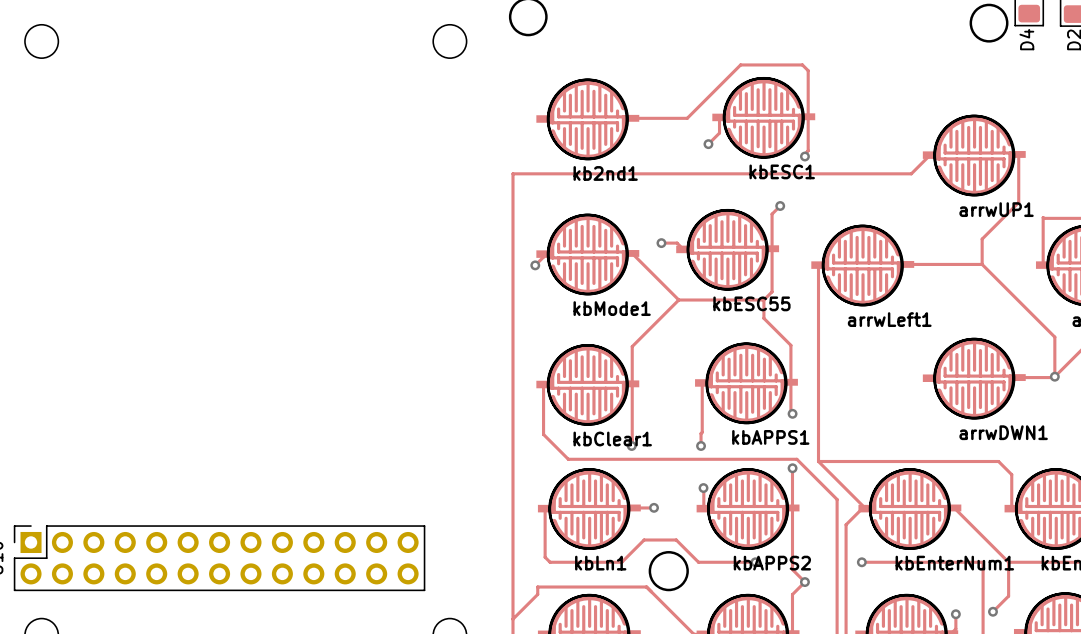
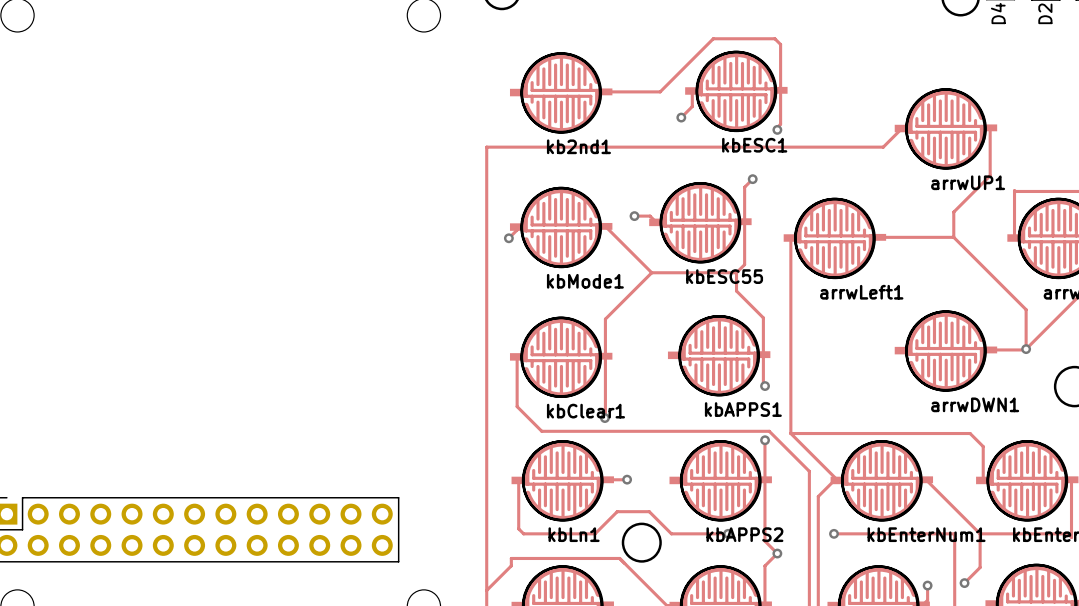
track: (702, 382) (701, 445) -> none
via: (701, 445) -> none
track: (703, 488) (703, 508) -> none
via: (703, 488) -> none

